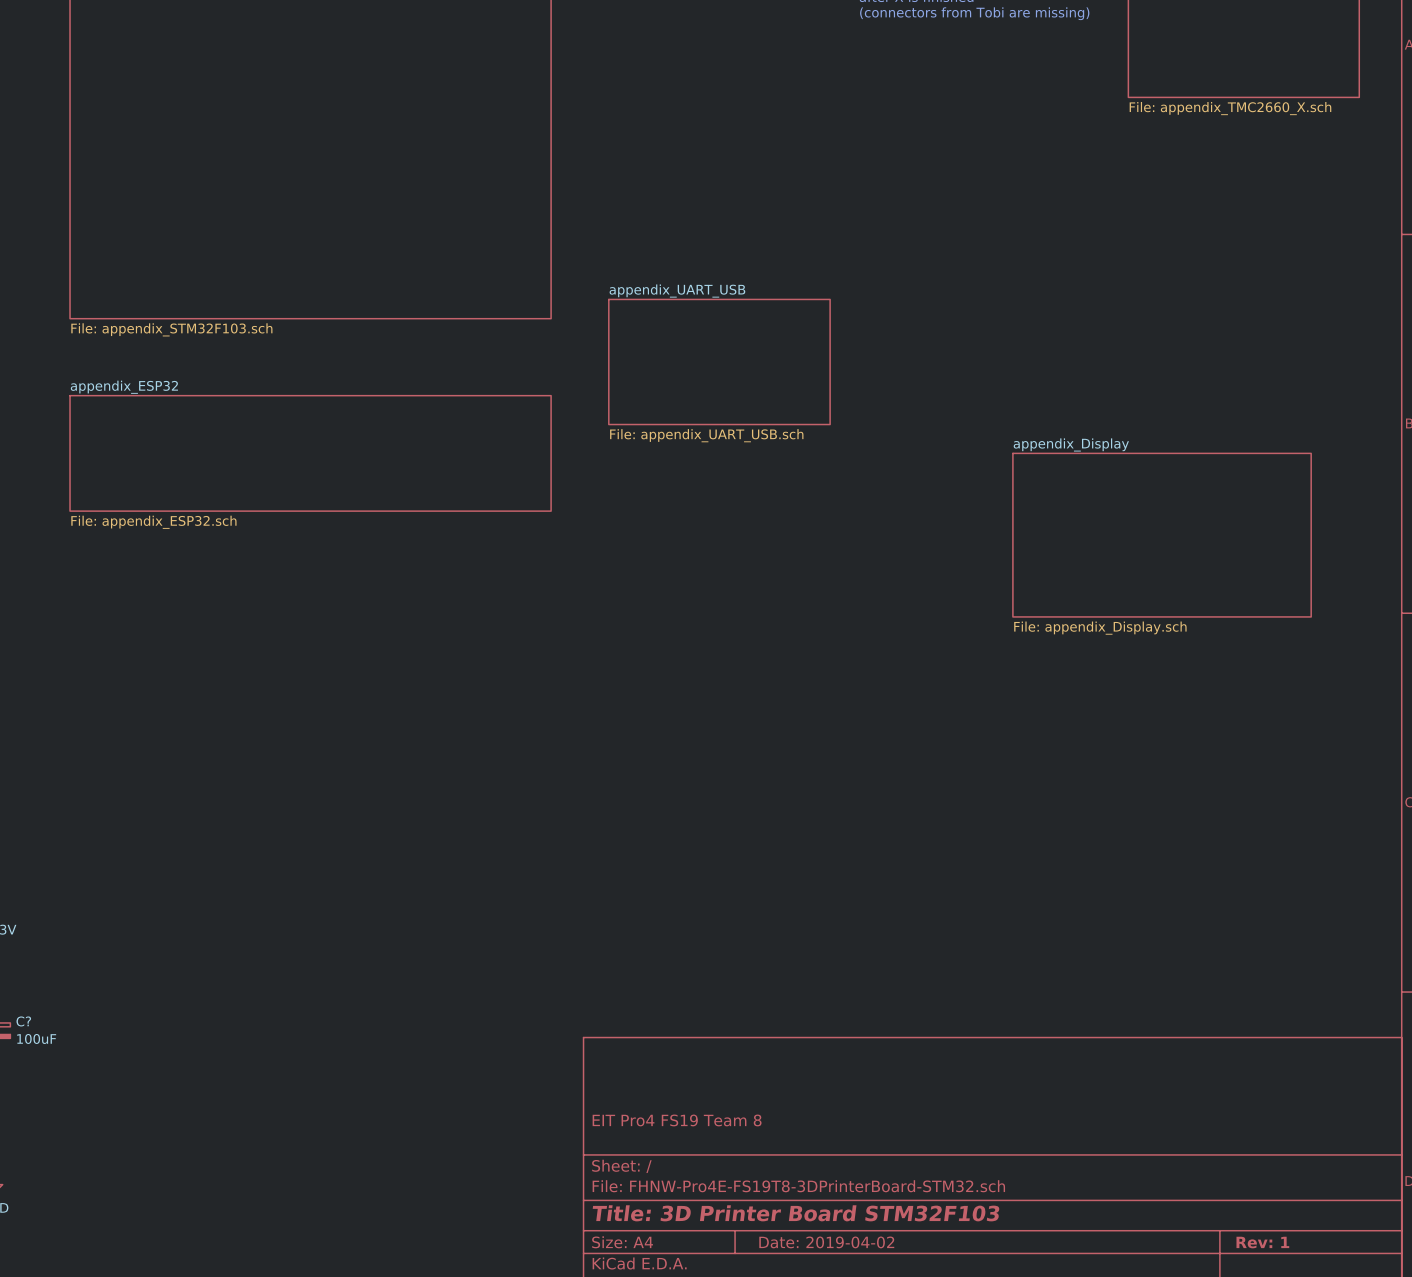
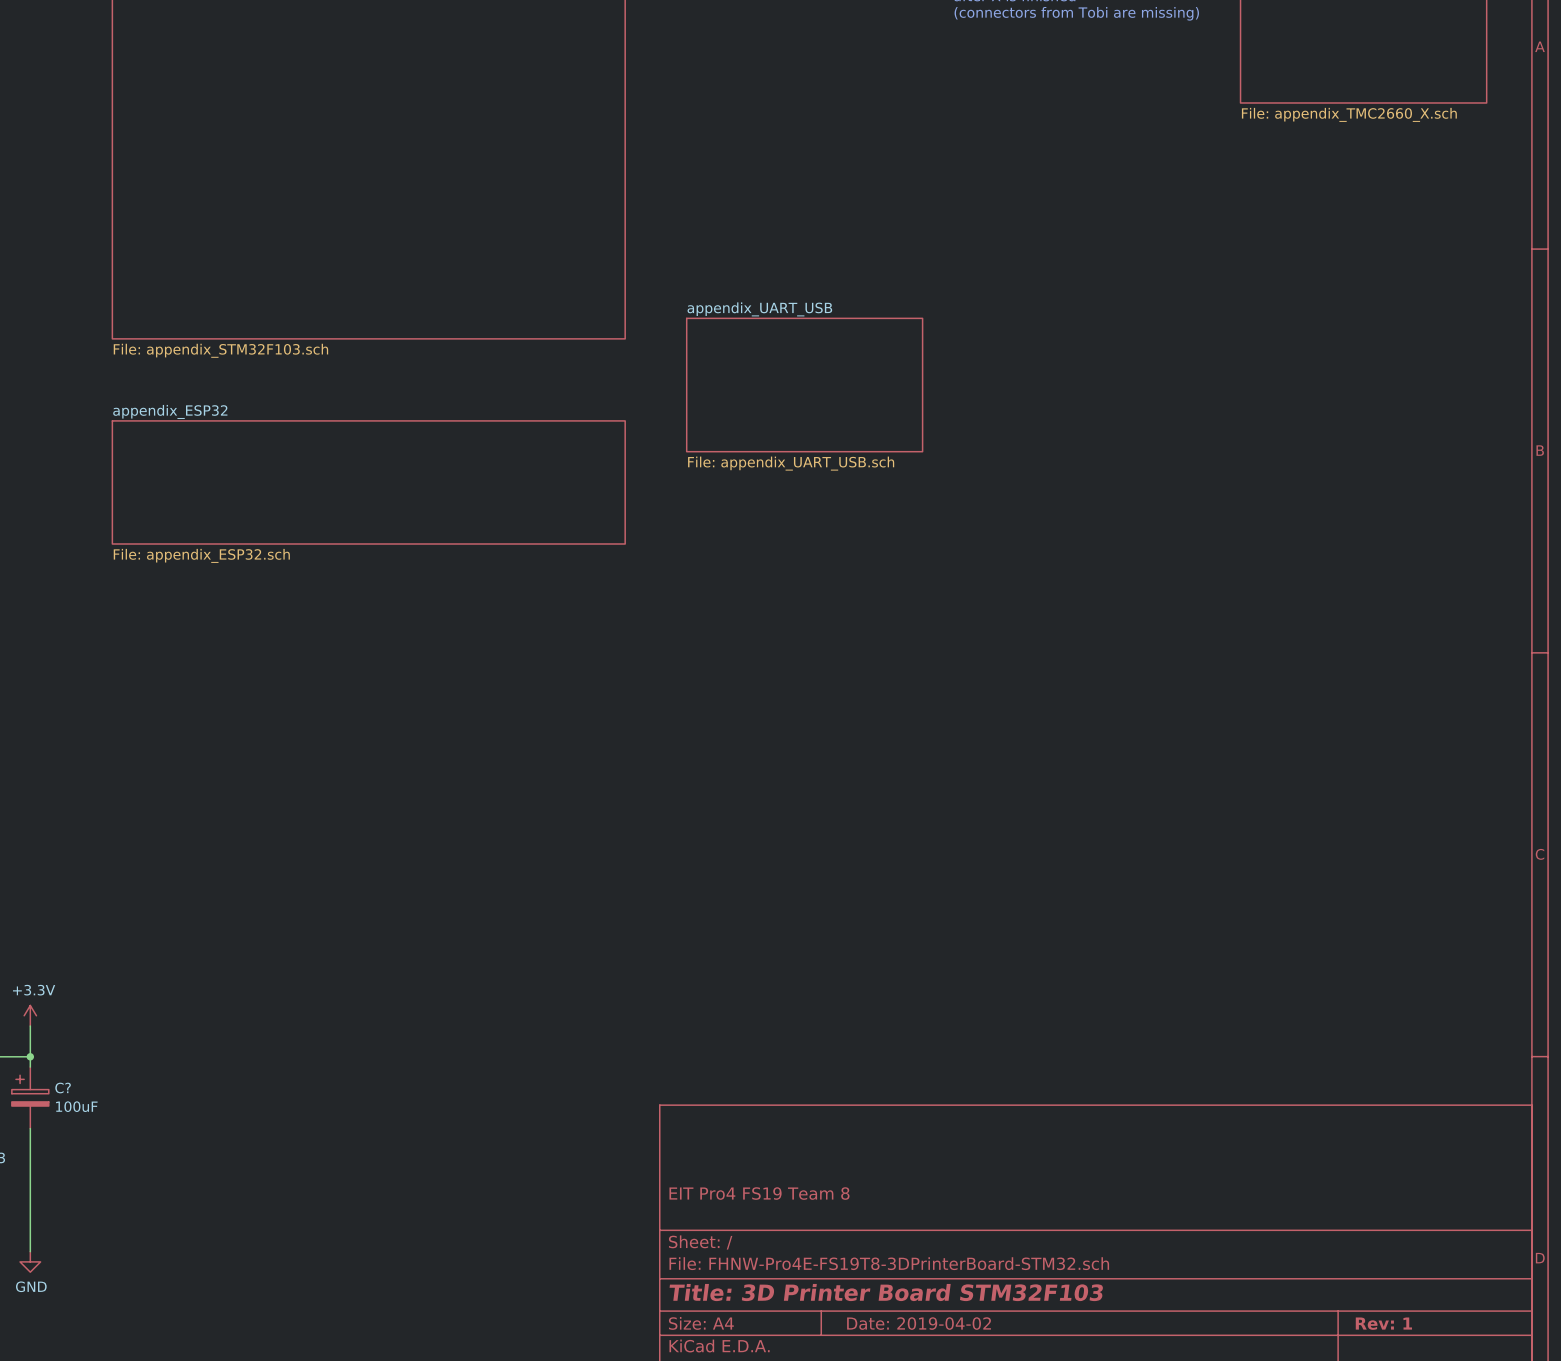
sheet appendix_Display: File: appendix_Display.sch (1162, 535) -> none

